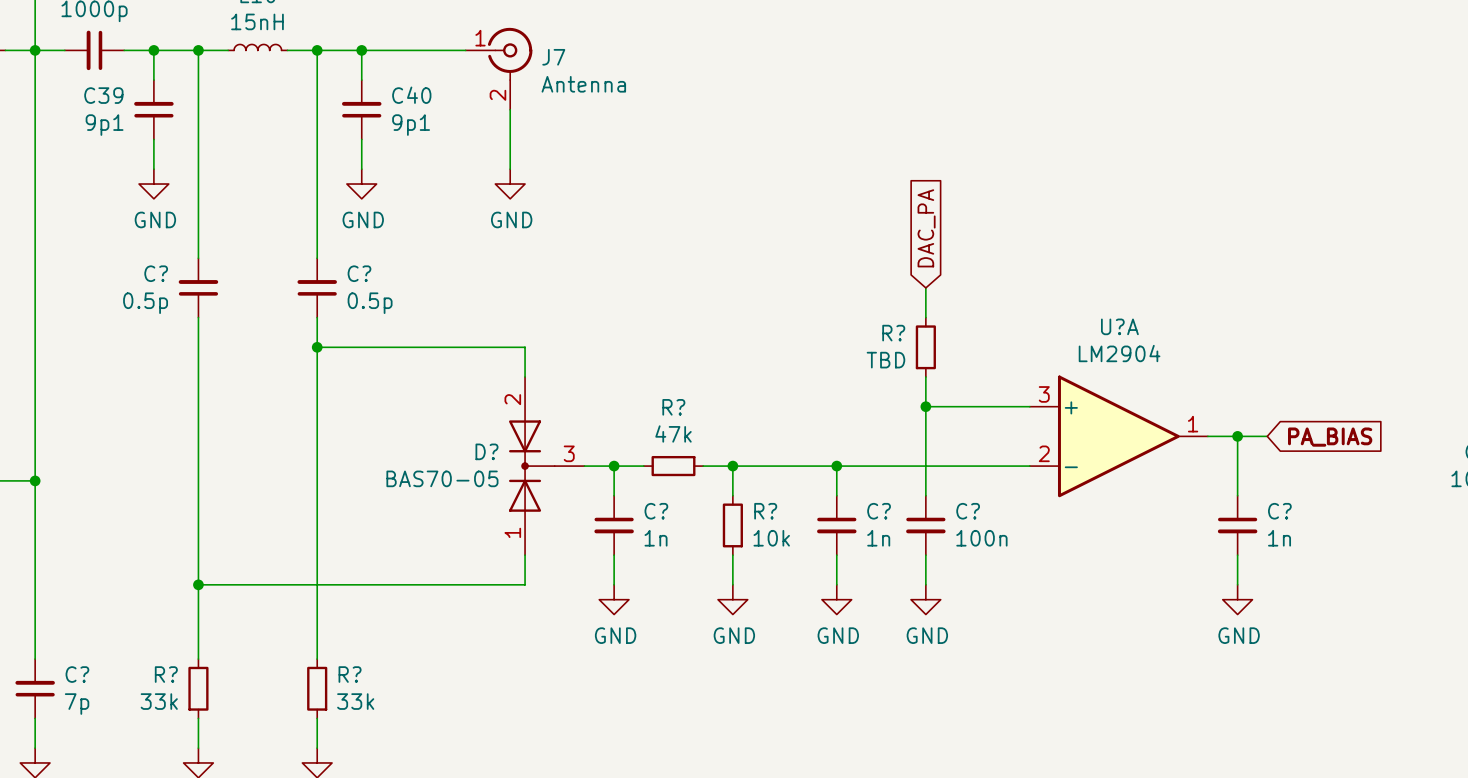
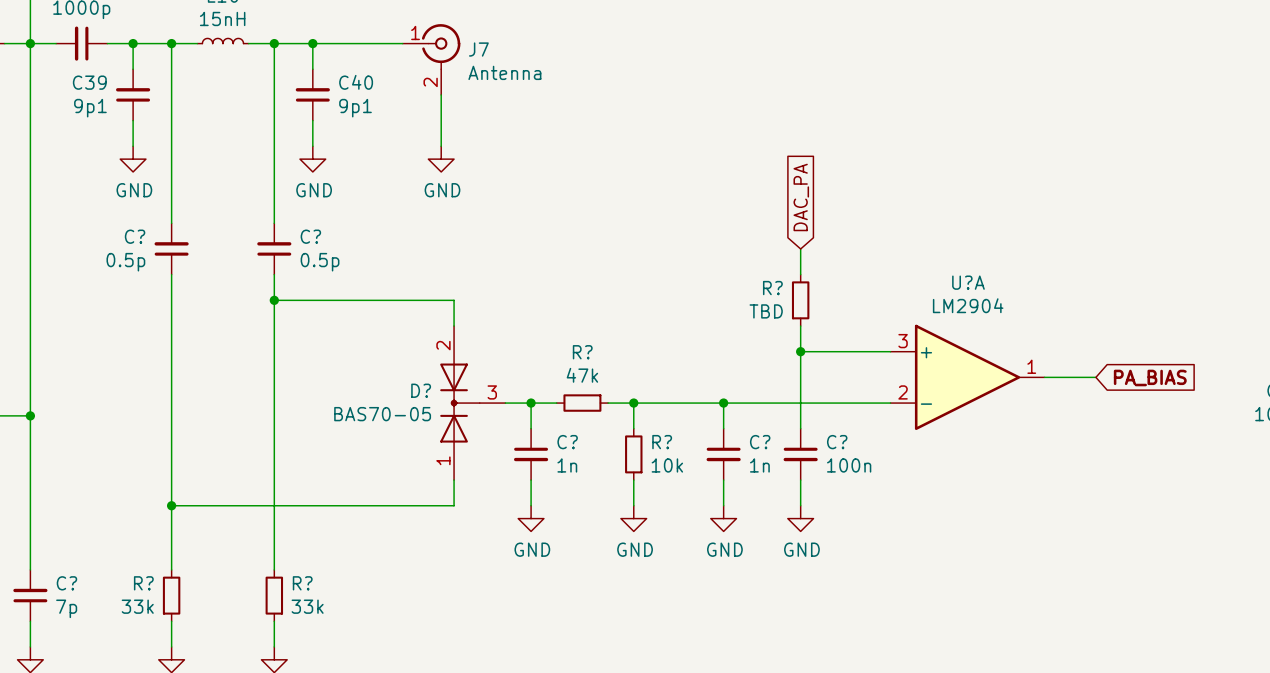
wire: (1237, 436) (1237, 495) -> none
junction: (1237, 436) -> none
C?: 1n (1237, 525) -> none
wire: (1237, 555) (1237, 584) -> none
power symbol: GND (1237, 599) -> none

